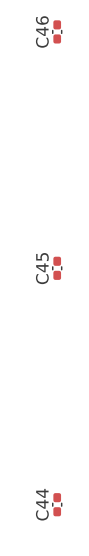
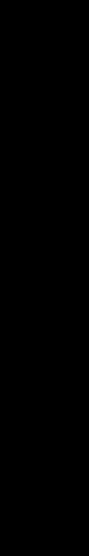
C46: (57, 31) -> none
C45: (57, 268) -> none
C44: (57, 504) -> none

